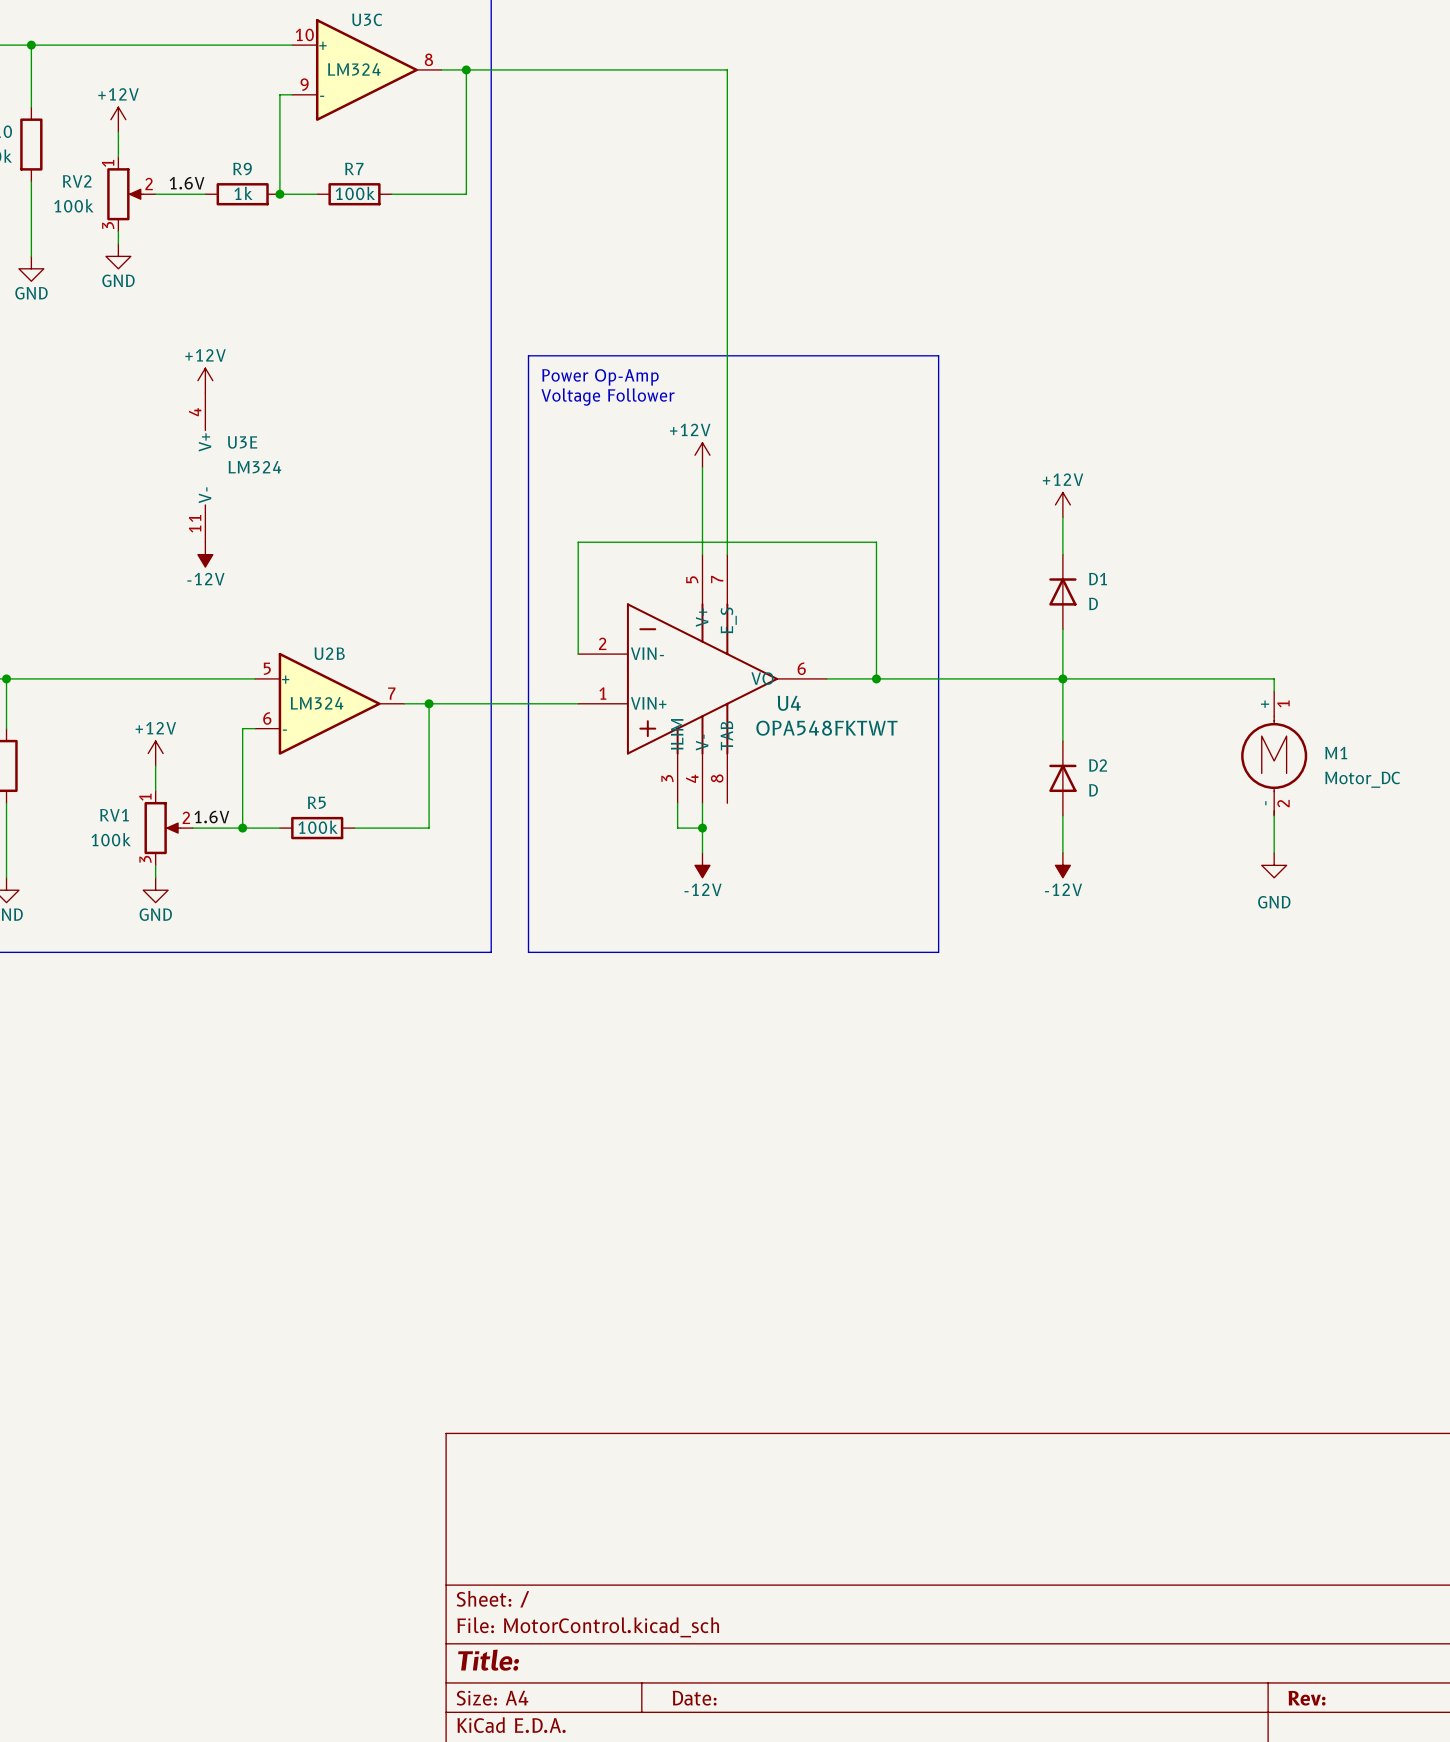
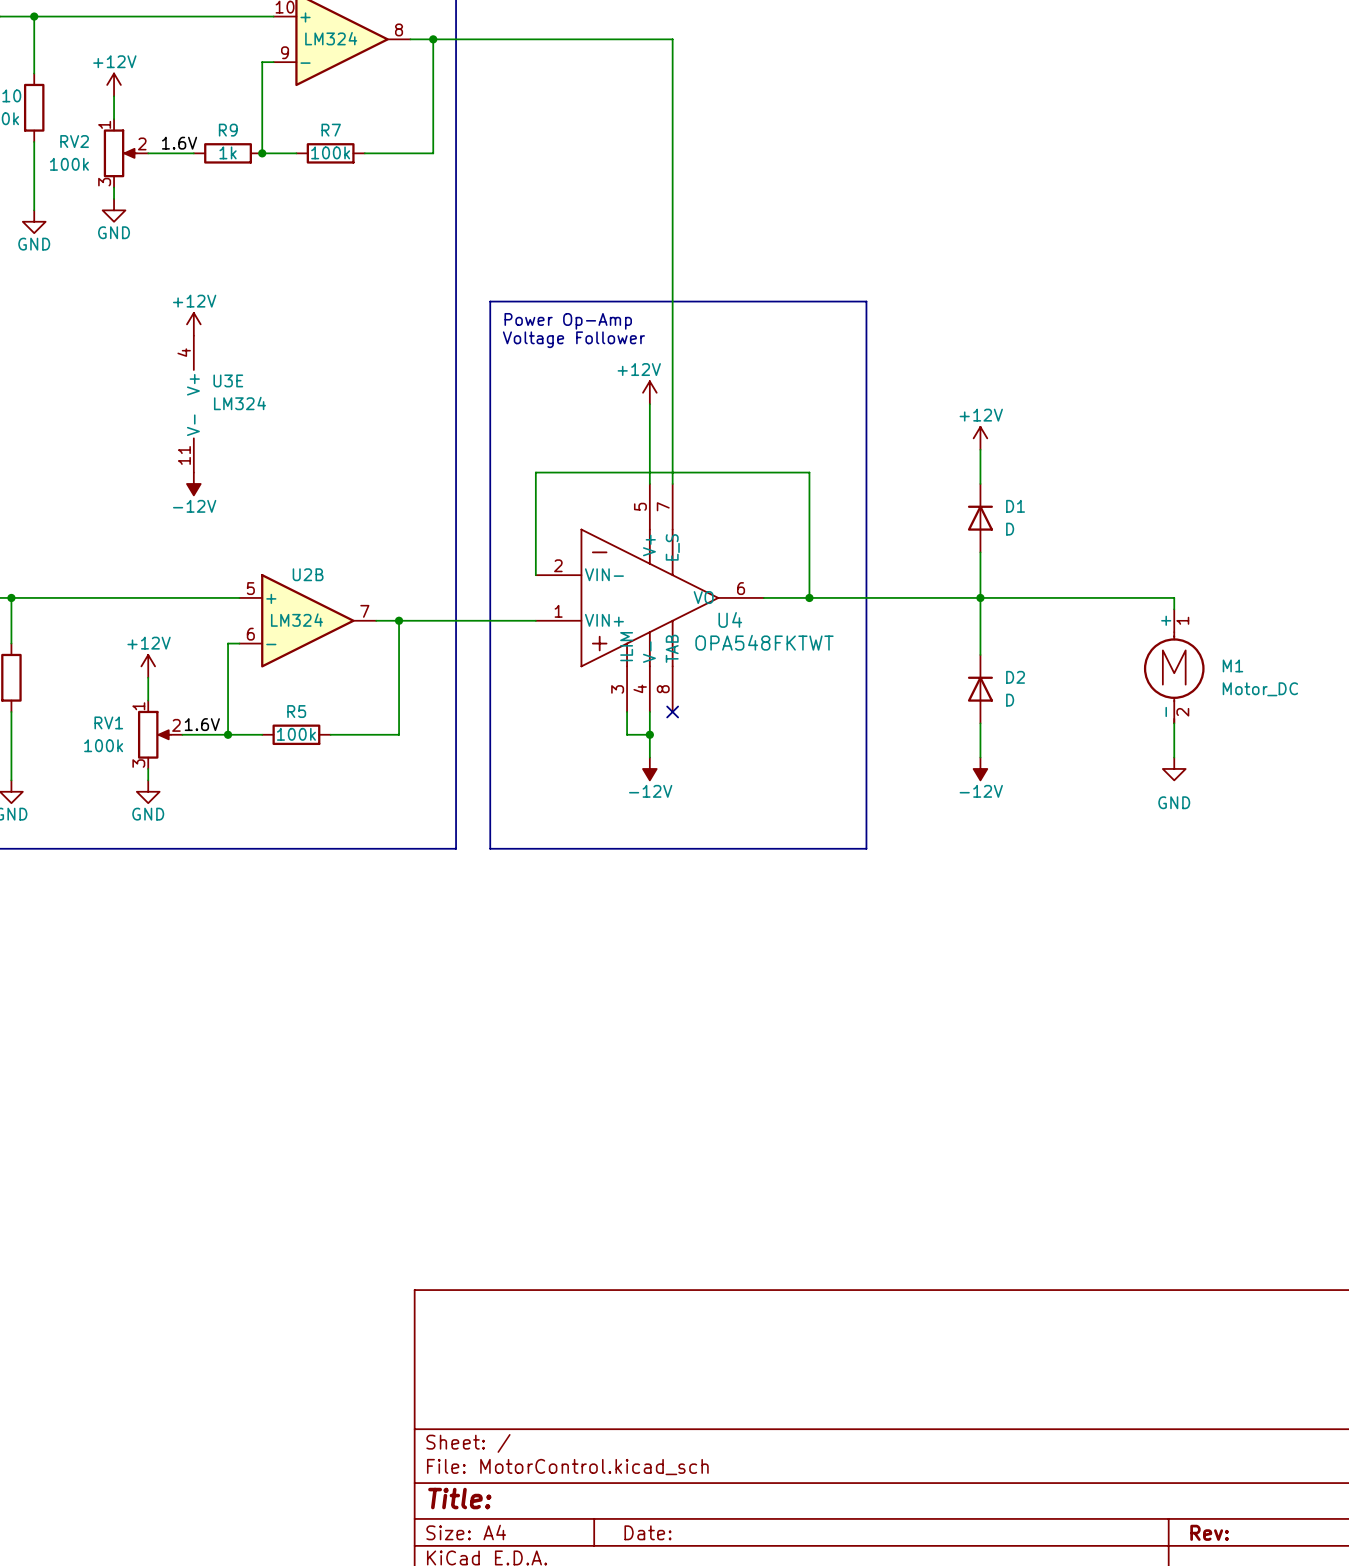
no-connect mark: none -> (672, 711)

